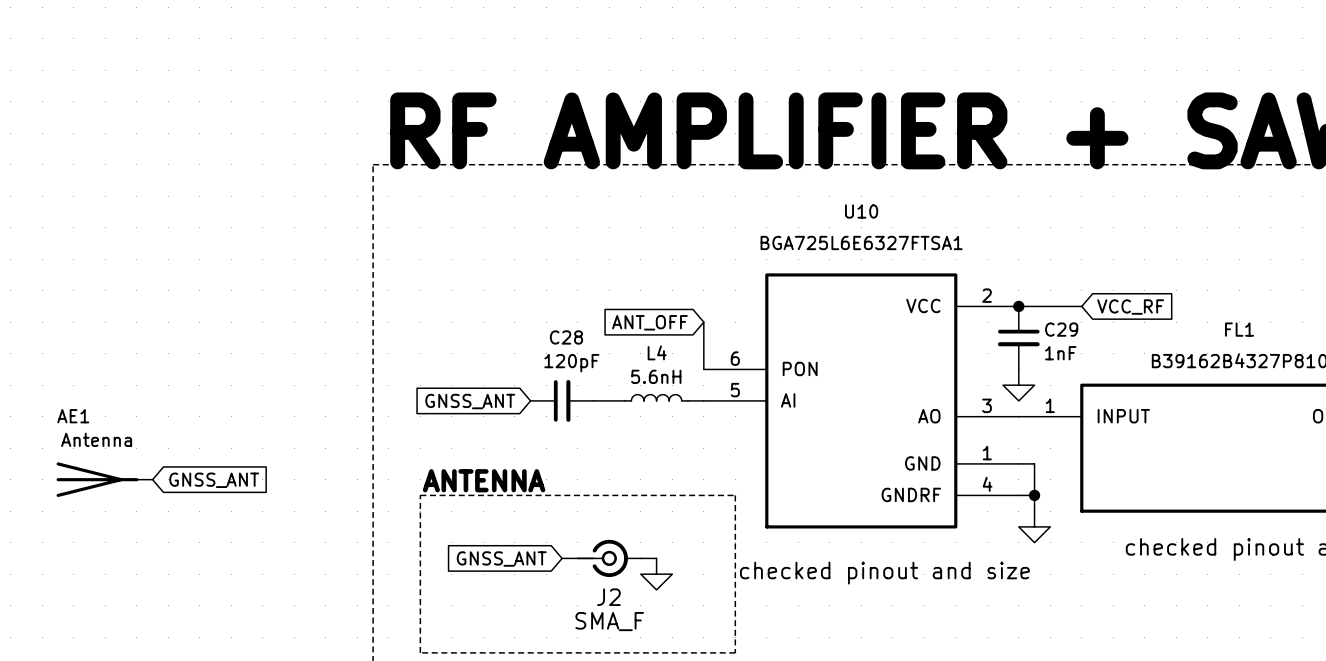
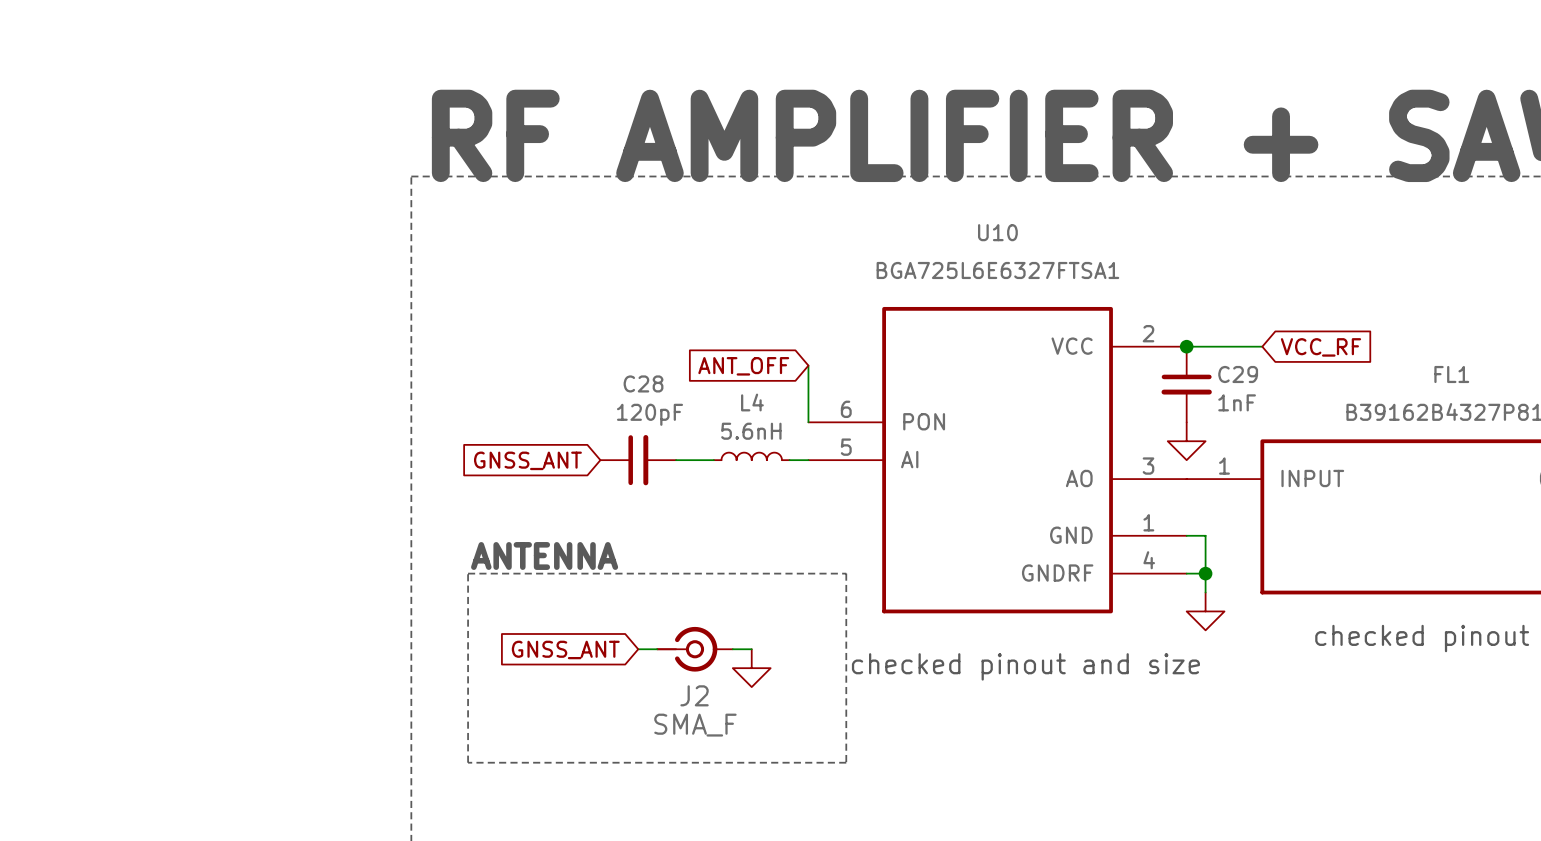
AE1: Antenna (104, 479) -> none
global label: GNSS_ANT (214, 480) -> none

